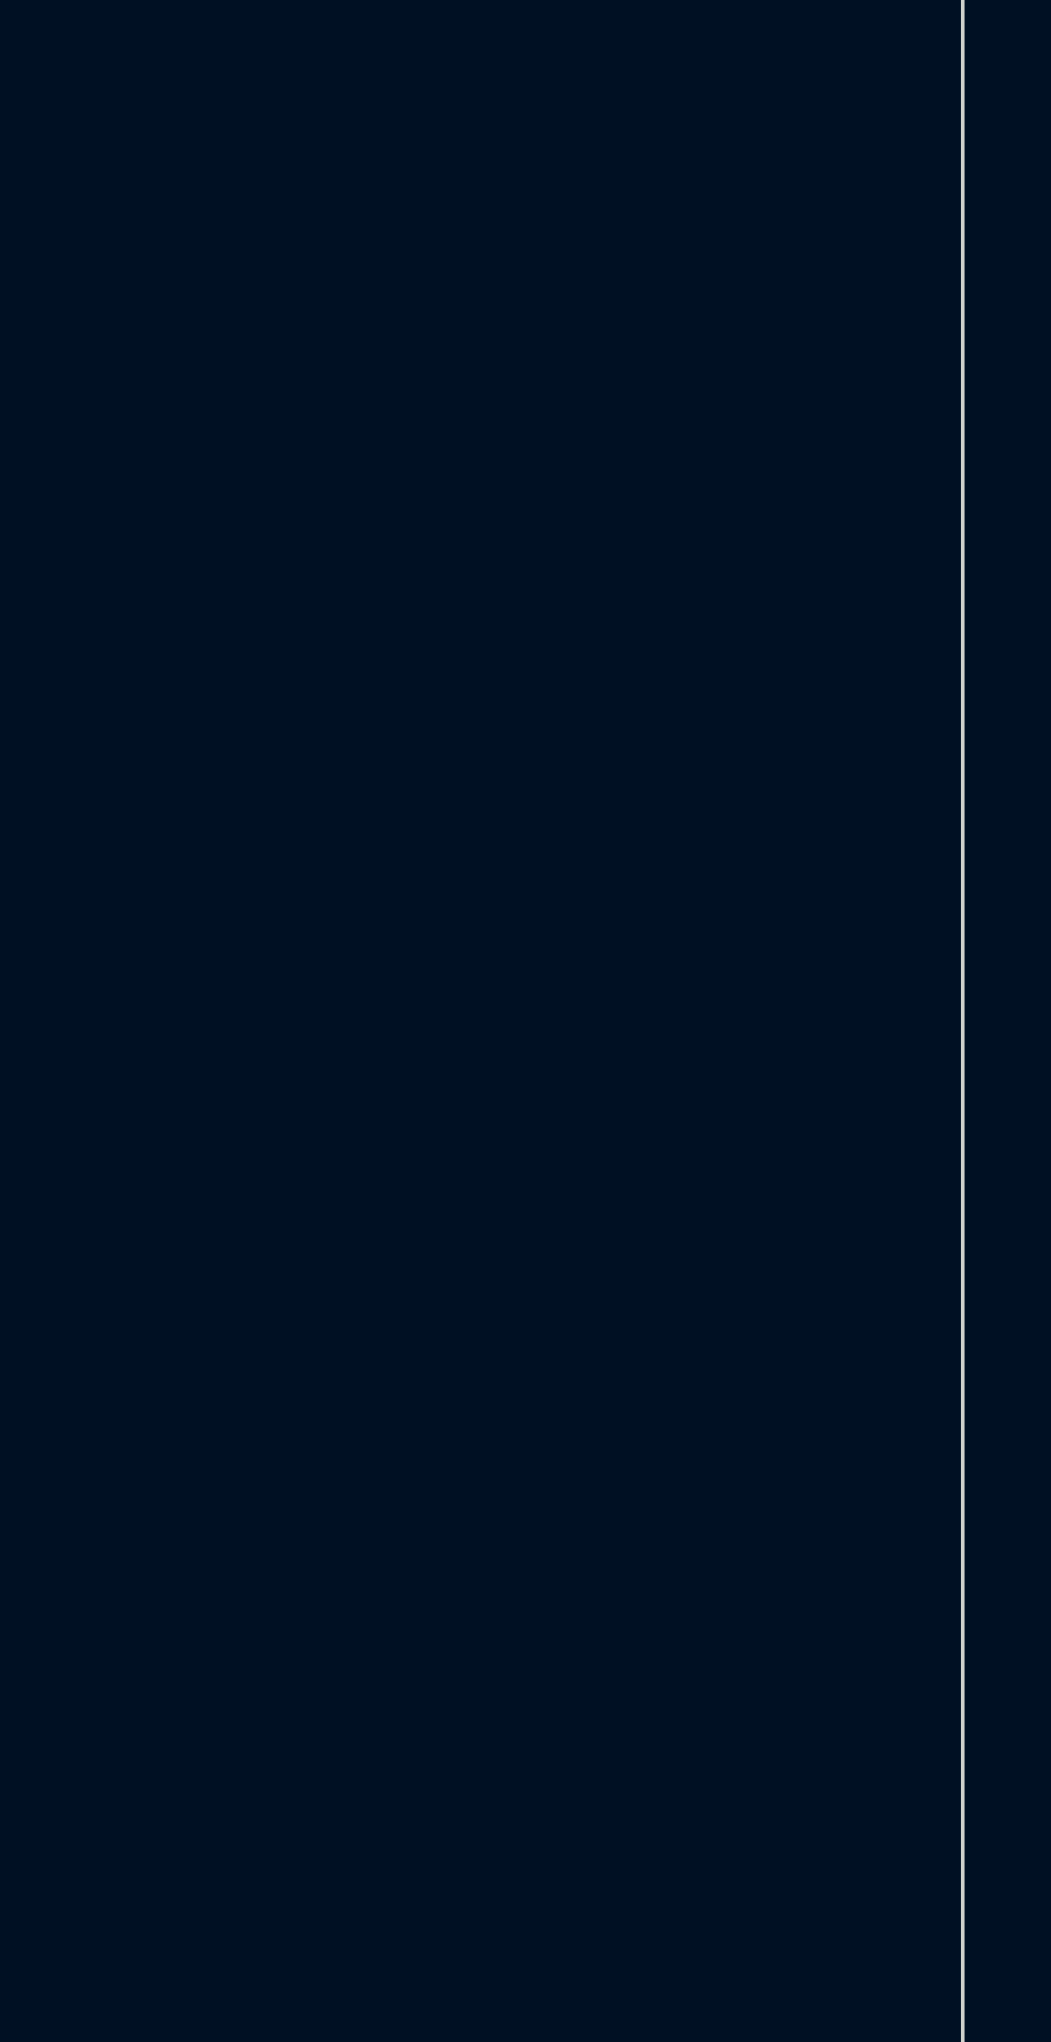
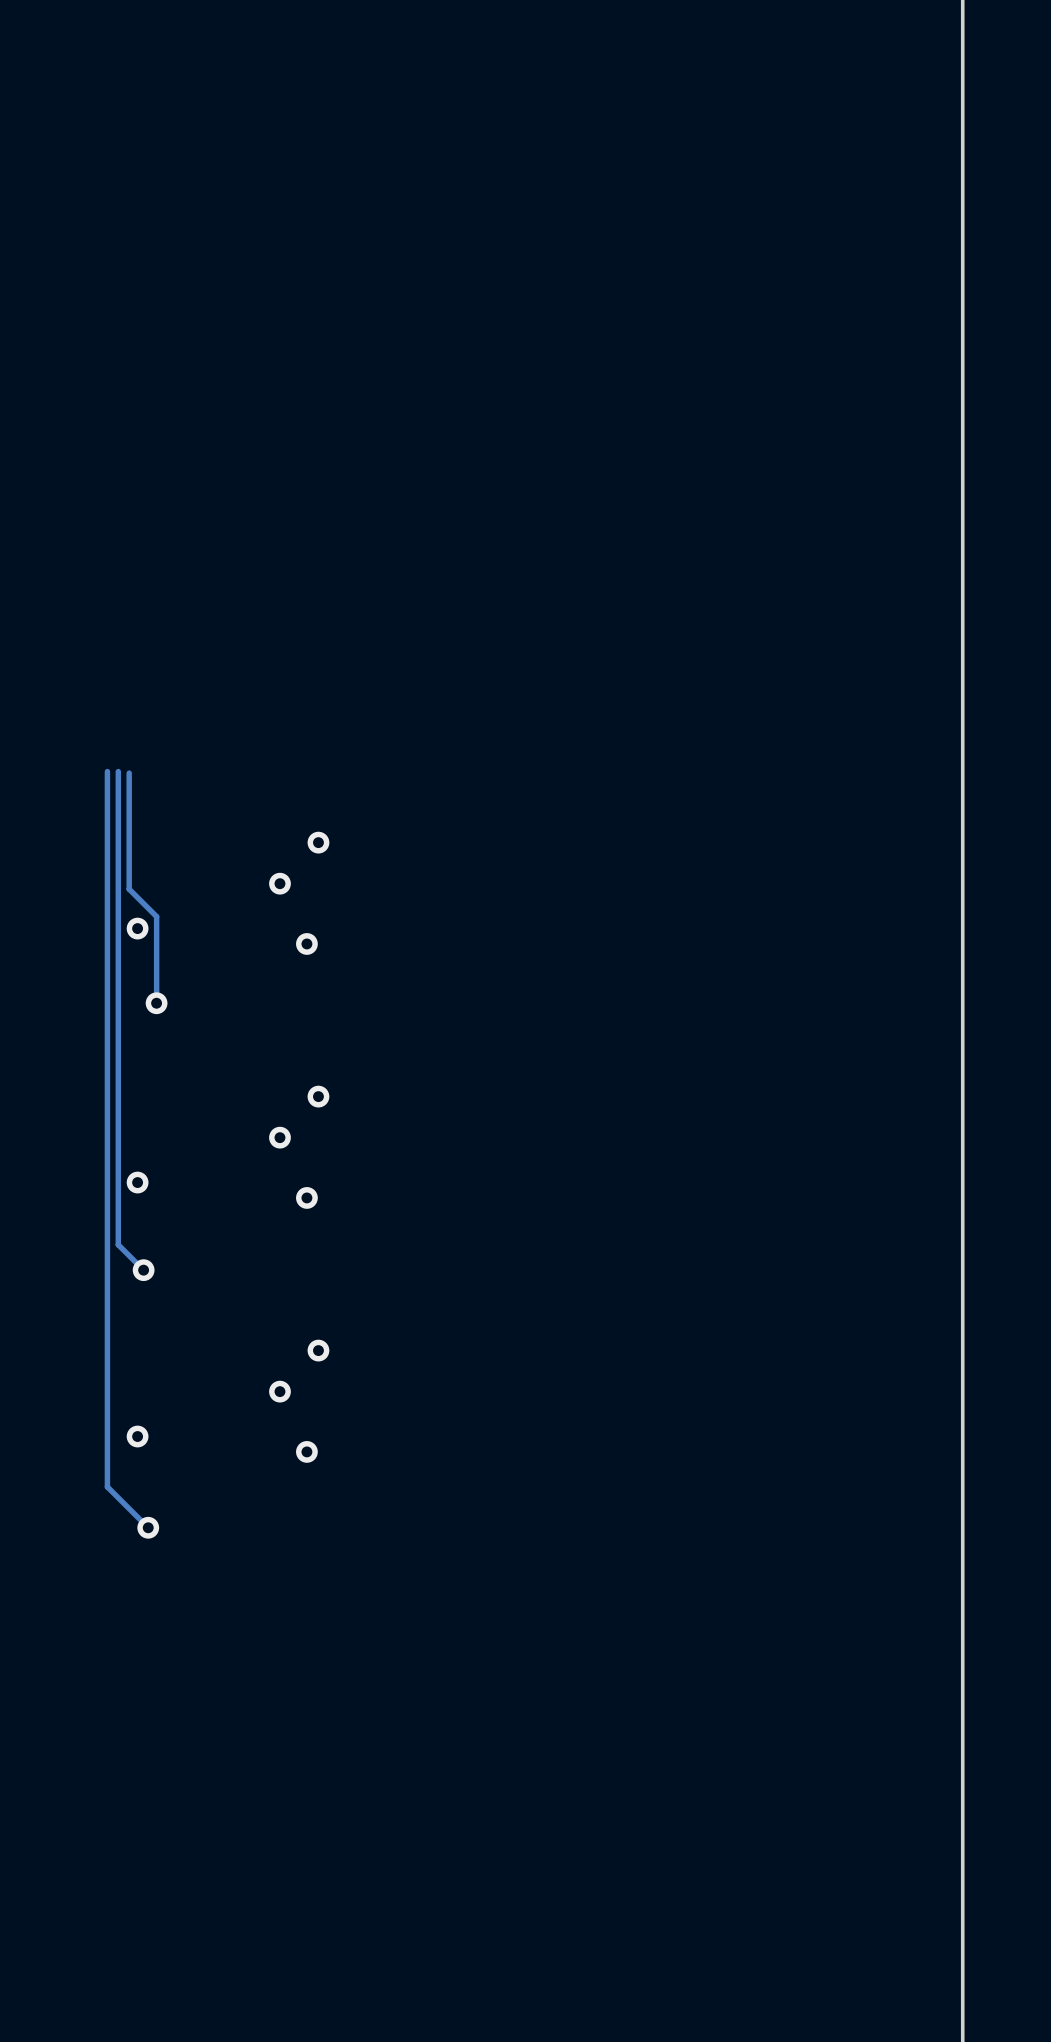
track: none -> (107, 771) (107, 1486) (148, 1527)
track: none -> (118, 771) (118, 1244) (143, 1270)
track: none -> (129, 773) (129, 889) (156, 916) (156, 1003) (158, 1001)
via: none -> (318, 842)
via: none -> (279, 883)
via: none -> (137, 928)
via: none -> (306, 943)
via: none -> (156, 1003)
via: none -> (318, 1096)
via: none -> (279, 1137)
via: none -> (137, 1182)
via: none -> (306, 1197)
via: none -> (143, 1270)
via: none -> (318, 1350)
via: none -> (279, 1391)
via: none -> (137, 1436)
via: none -> (306, 1451)
via: none -> (148, 1527)

